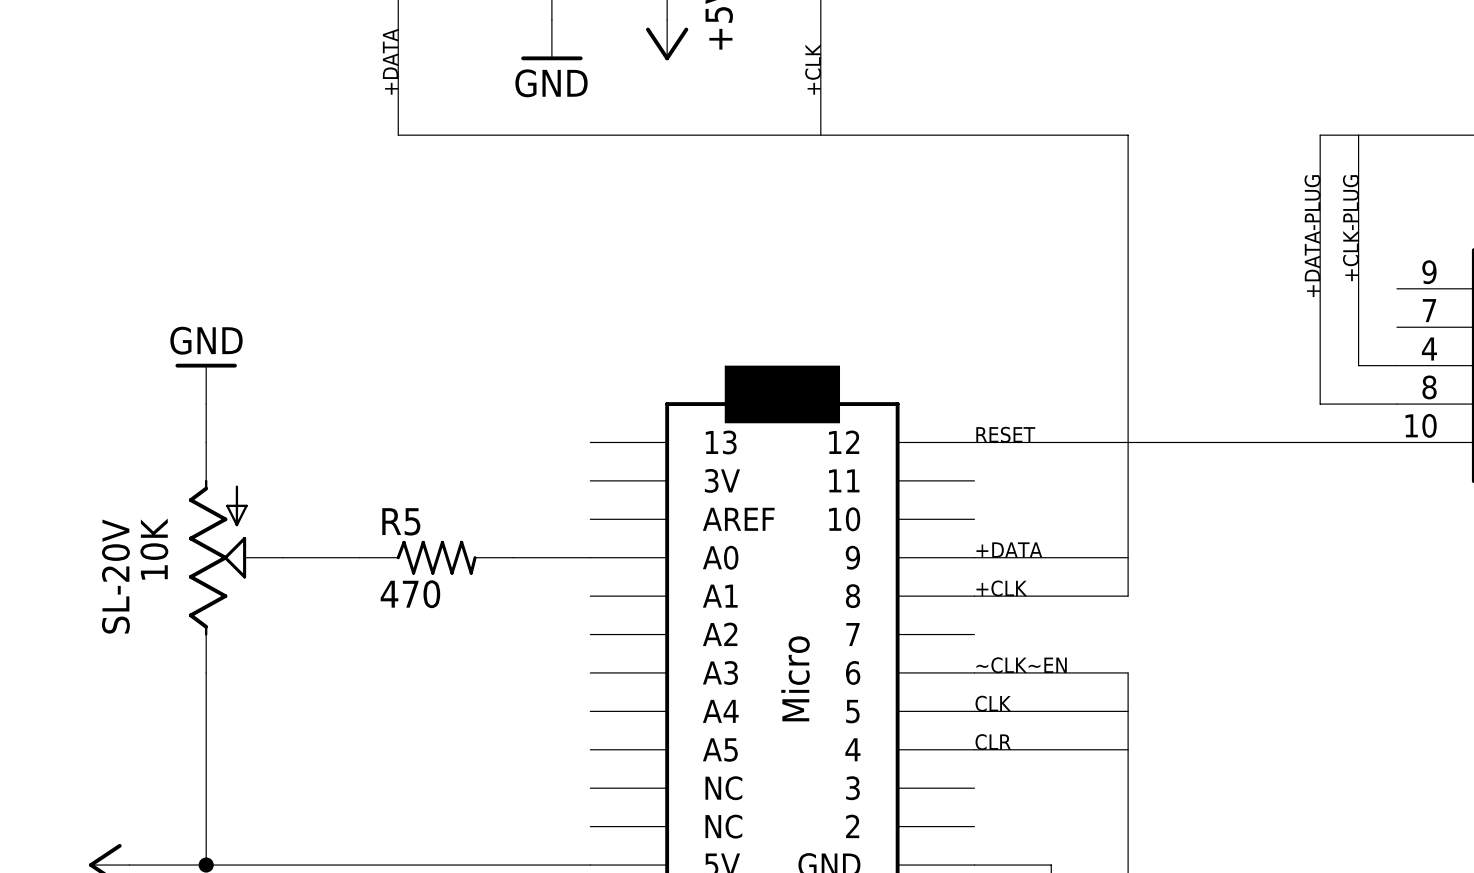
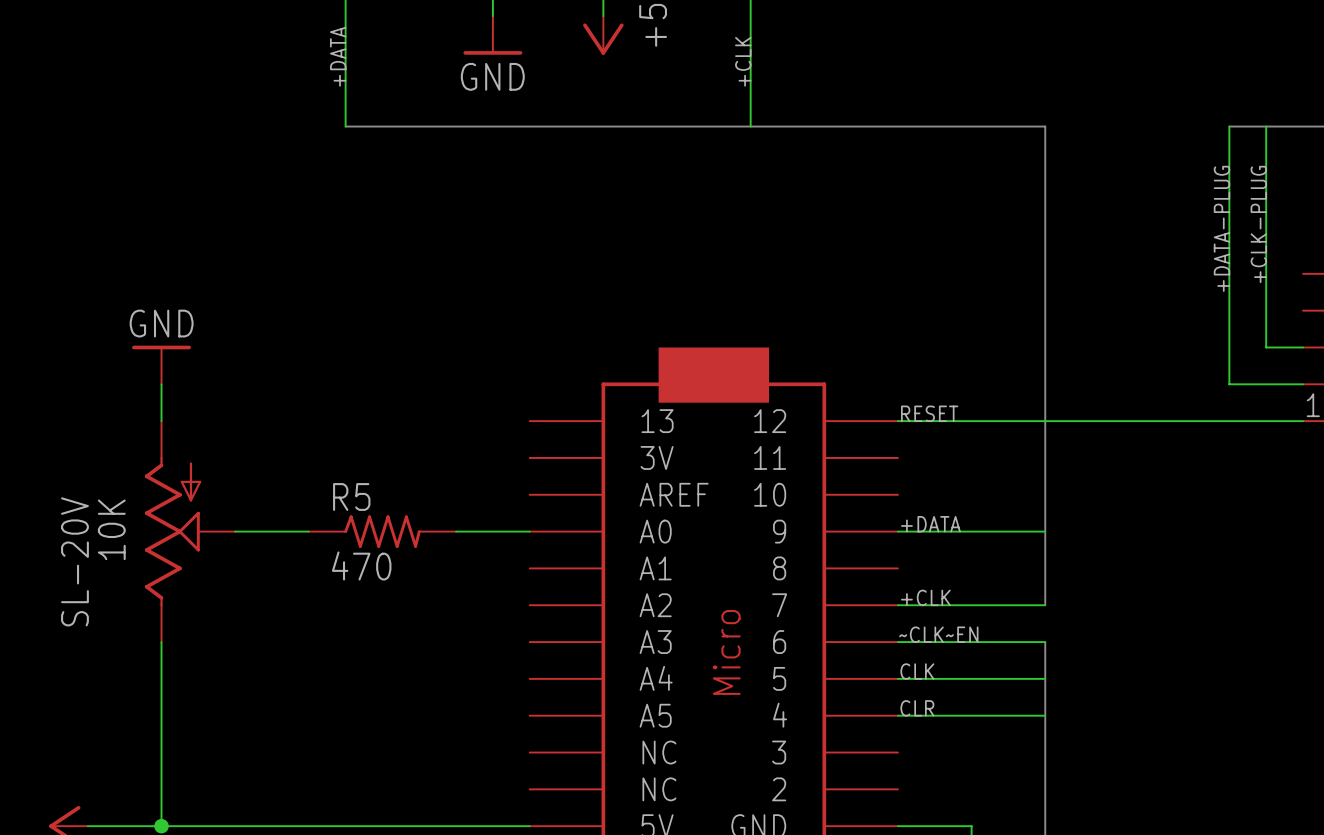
label position: +CLK (1001, 588) -> +CLK (925, 597)
wire: (974, 596) (1128, 596) -> (897, 605) (1045, 605)
bus: none -> (1045, 568) (1045, 605)

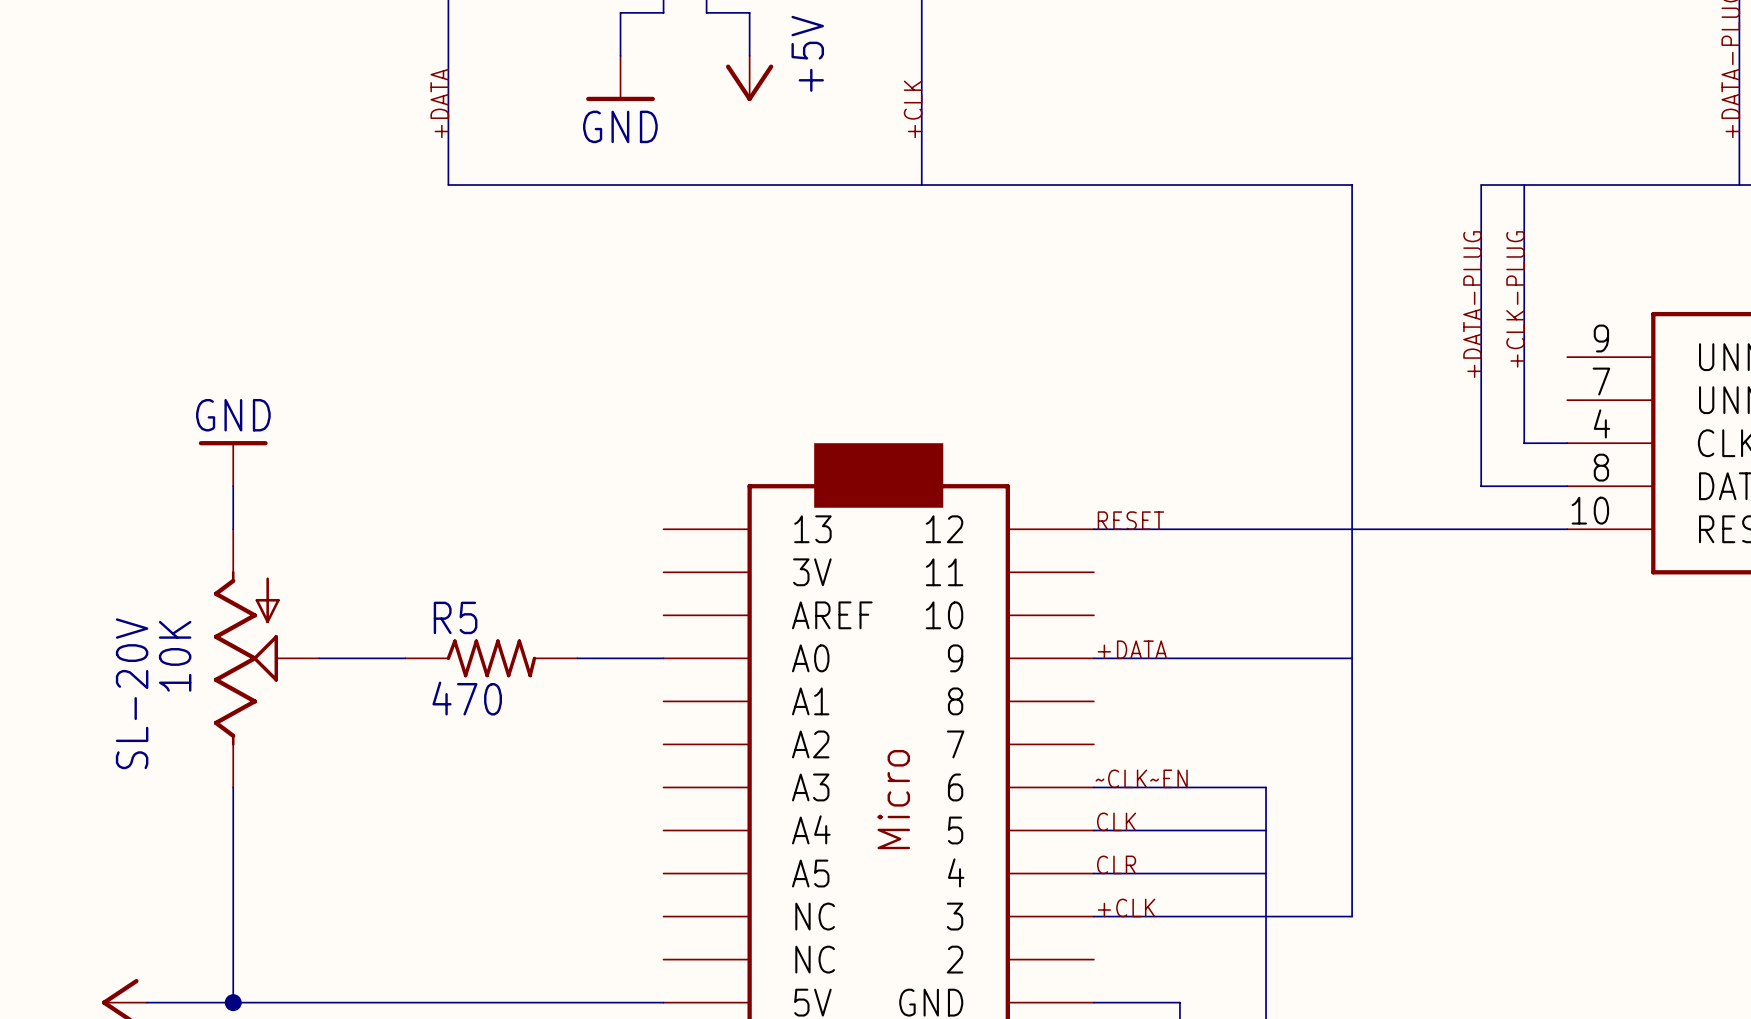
bus: (1045, 126) (1045, 605) -> (1266, 185) (1352, 185) (1352, 916)
wire: none -> (1266, 658) (1352, 658)
label position: +CLK (925, 597) -> +CLK (1126, 907)
wire: (897, 605) (1045, 605) -> none
wire: none -> (1093, 916) (1352, 916)

